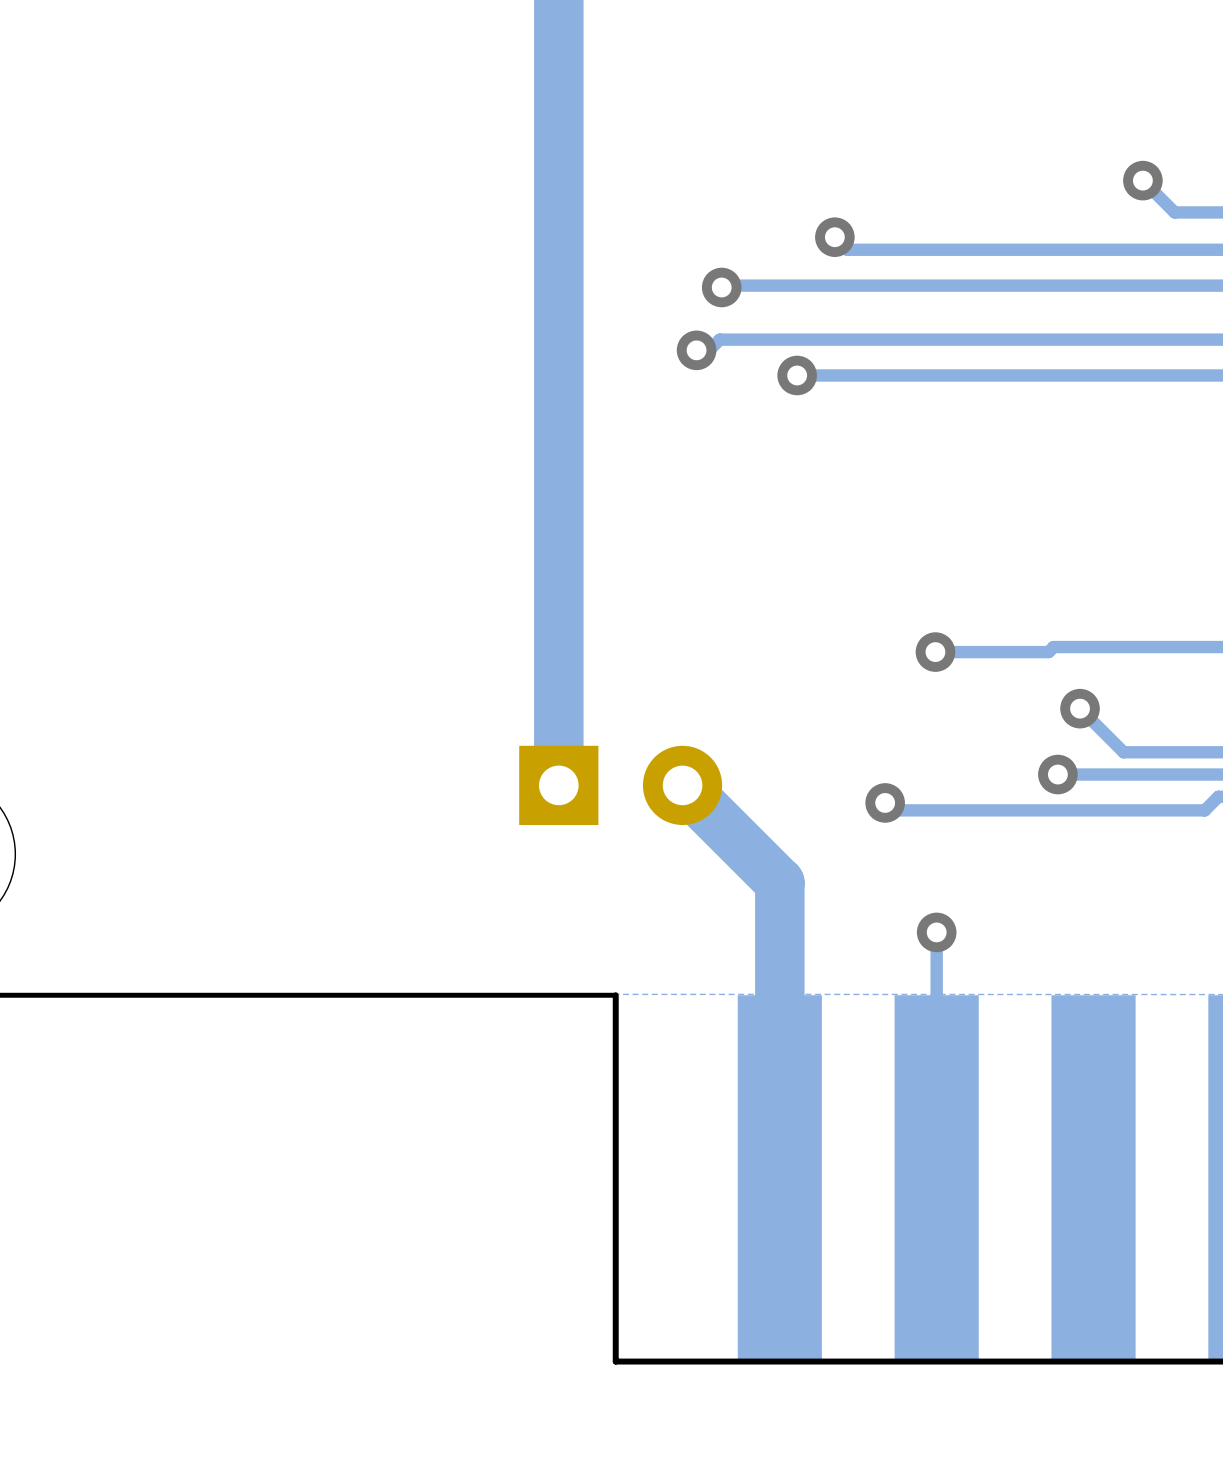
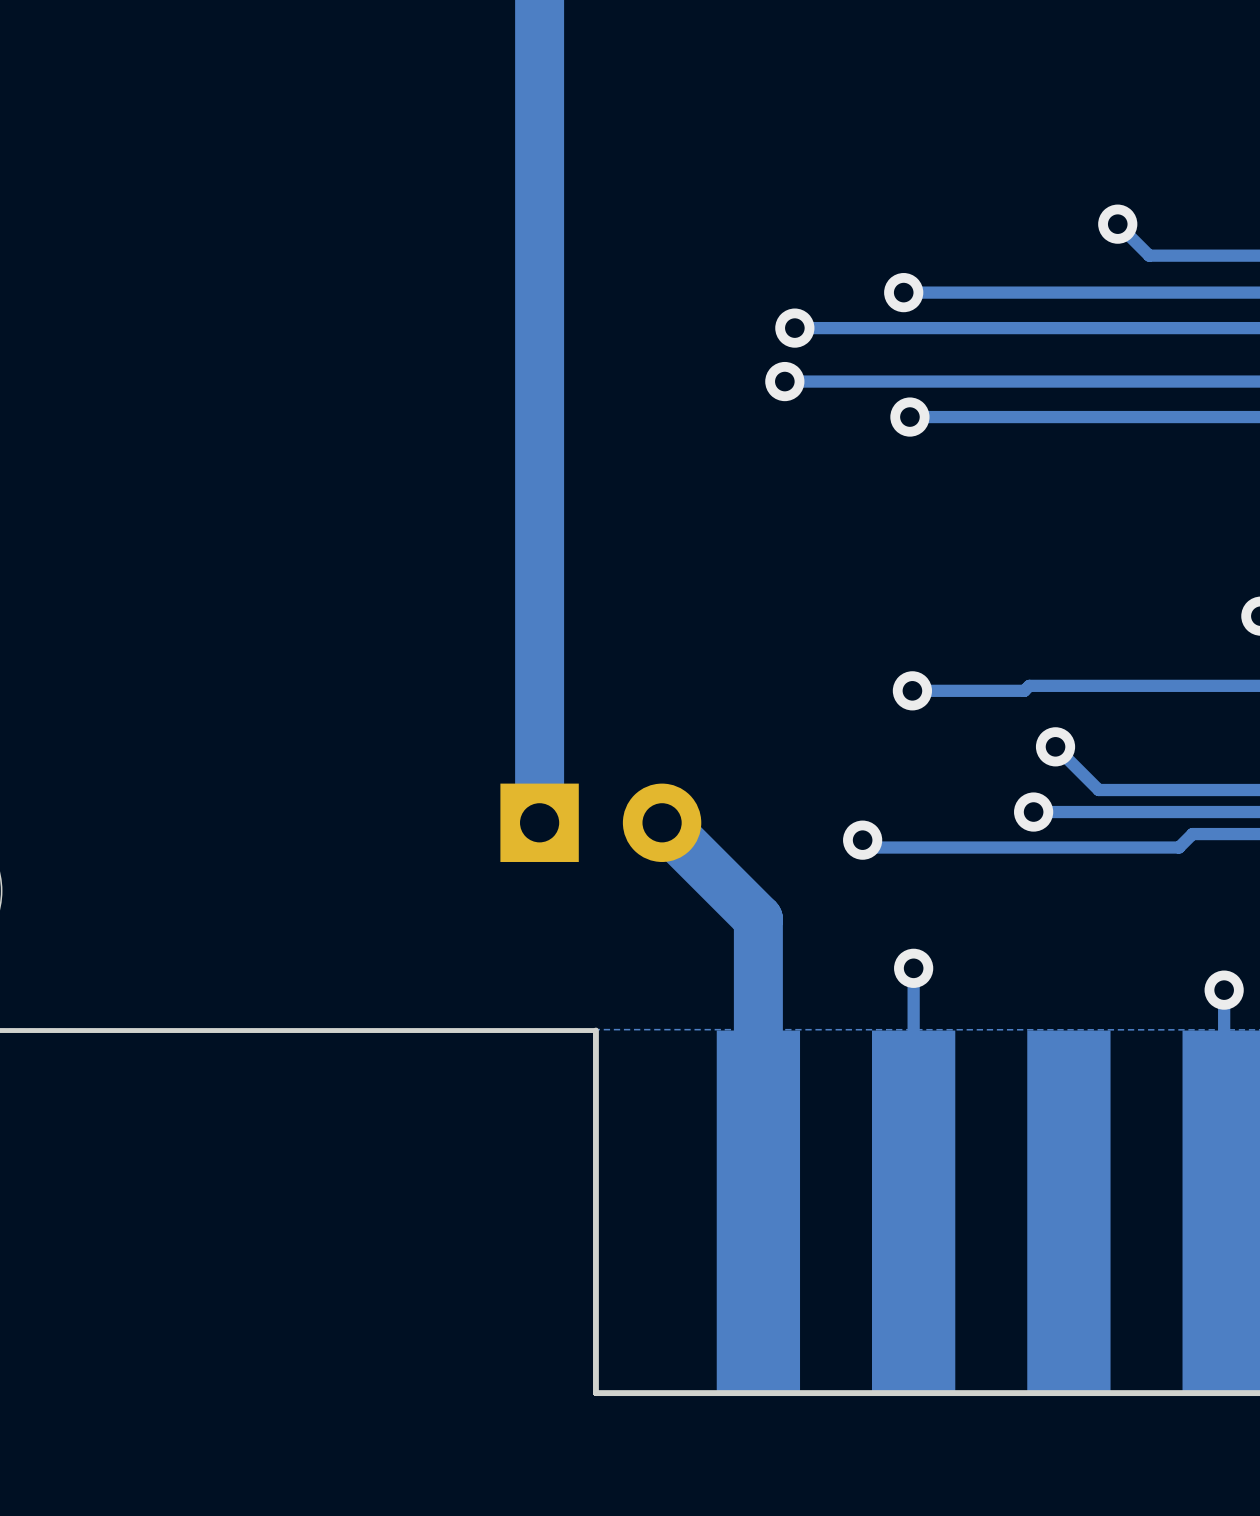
track: (834, 237) (847, 249) (926, 249) -> none
via: (834, 237) -> none
via: none -> (903, 292)
track: (816, 285) (723, 285) (721, 287) -> none
via: none -> (794, 328)
via: (721, 287) -> none
track: (806, 339) (719, 339) (709, 350) -> none
via: (696, 350) -> none
via position: (797, 375) -> (784, 381)
track: (932, 375) (797, 375) -> none
via: none -> (909, 417)

